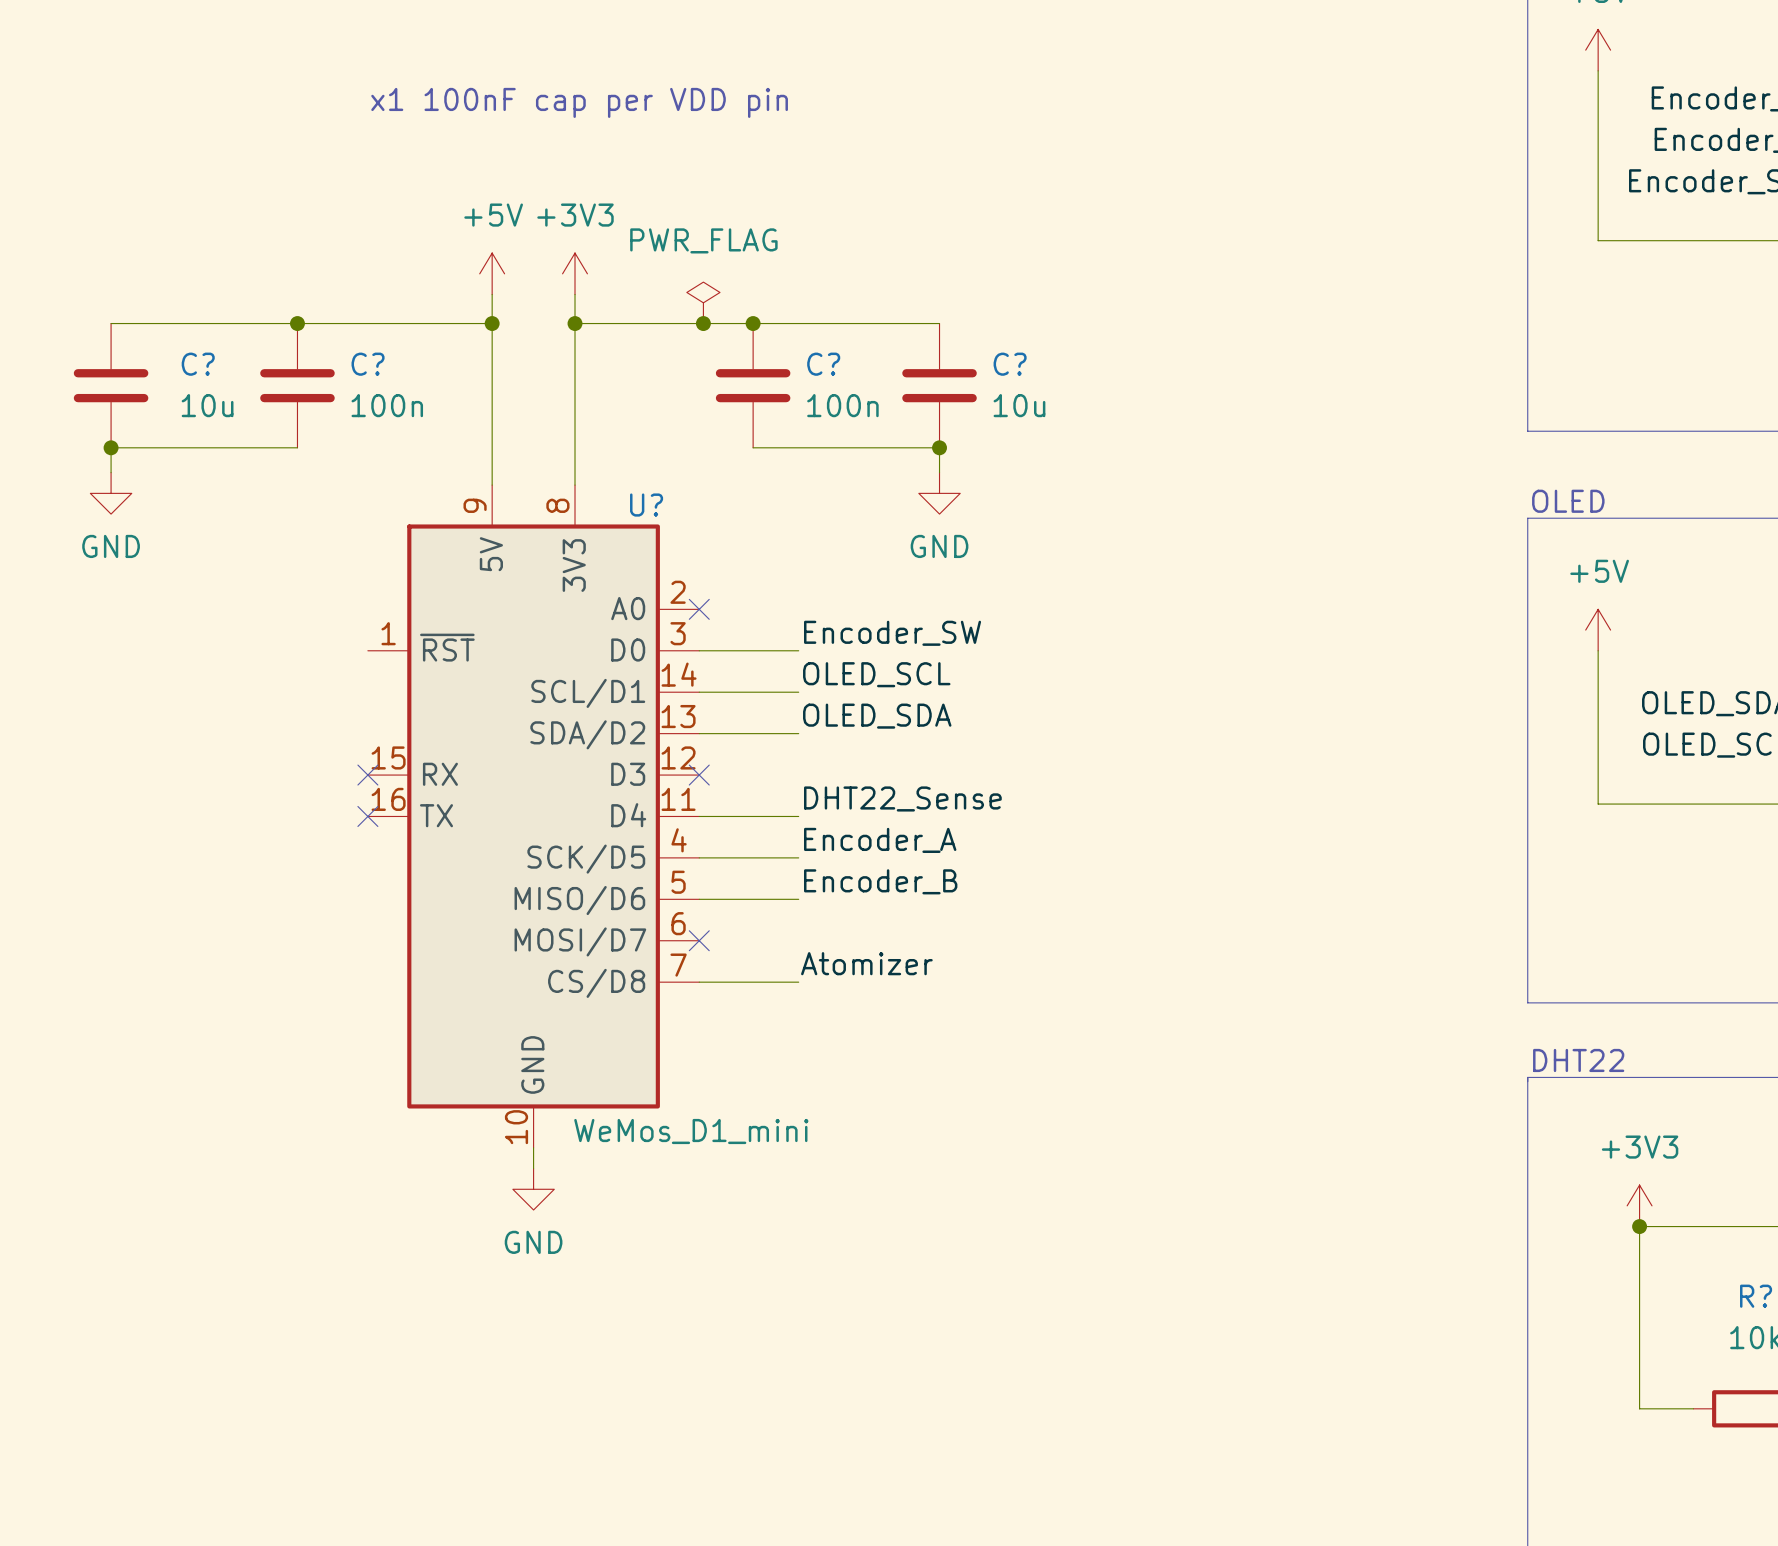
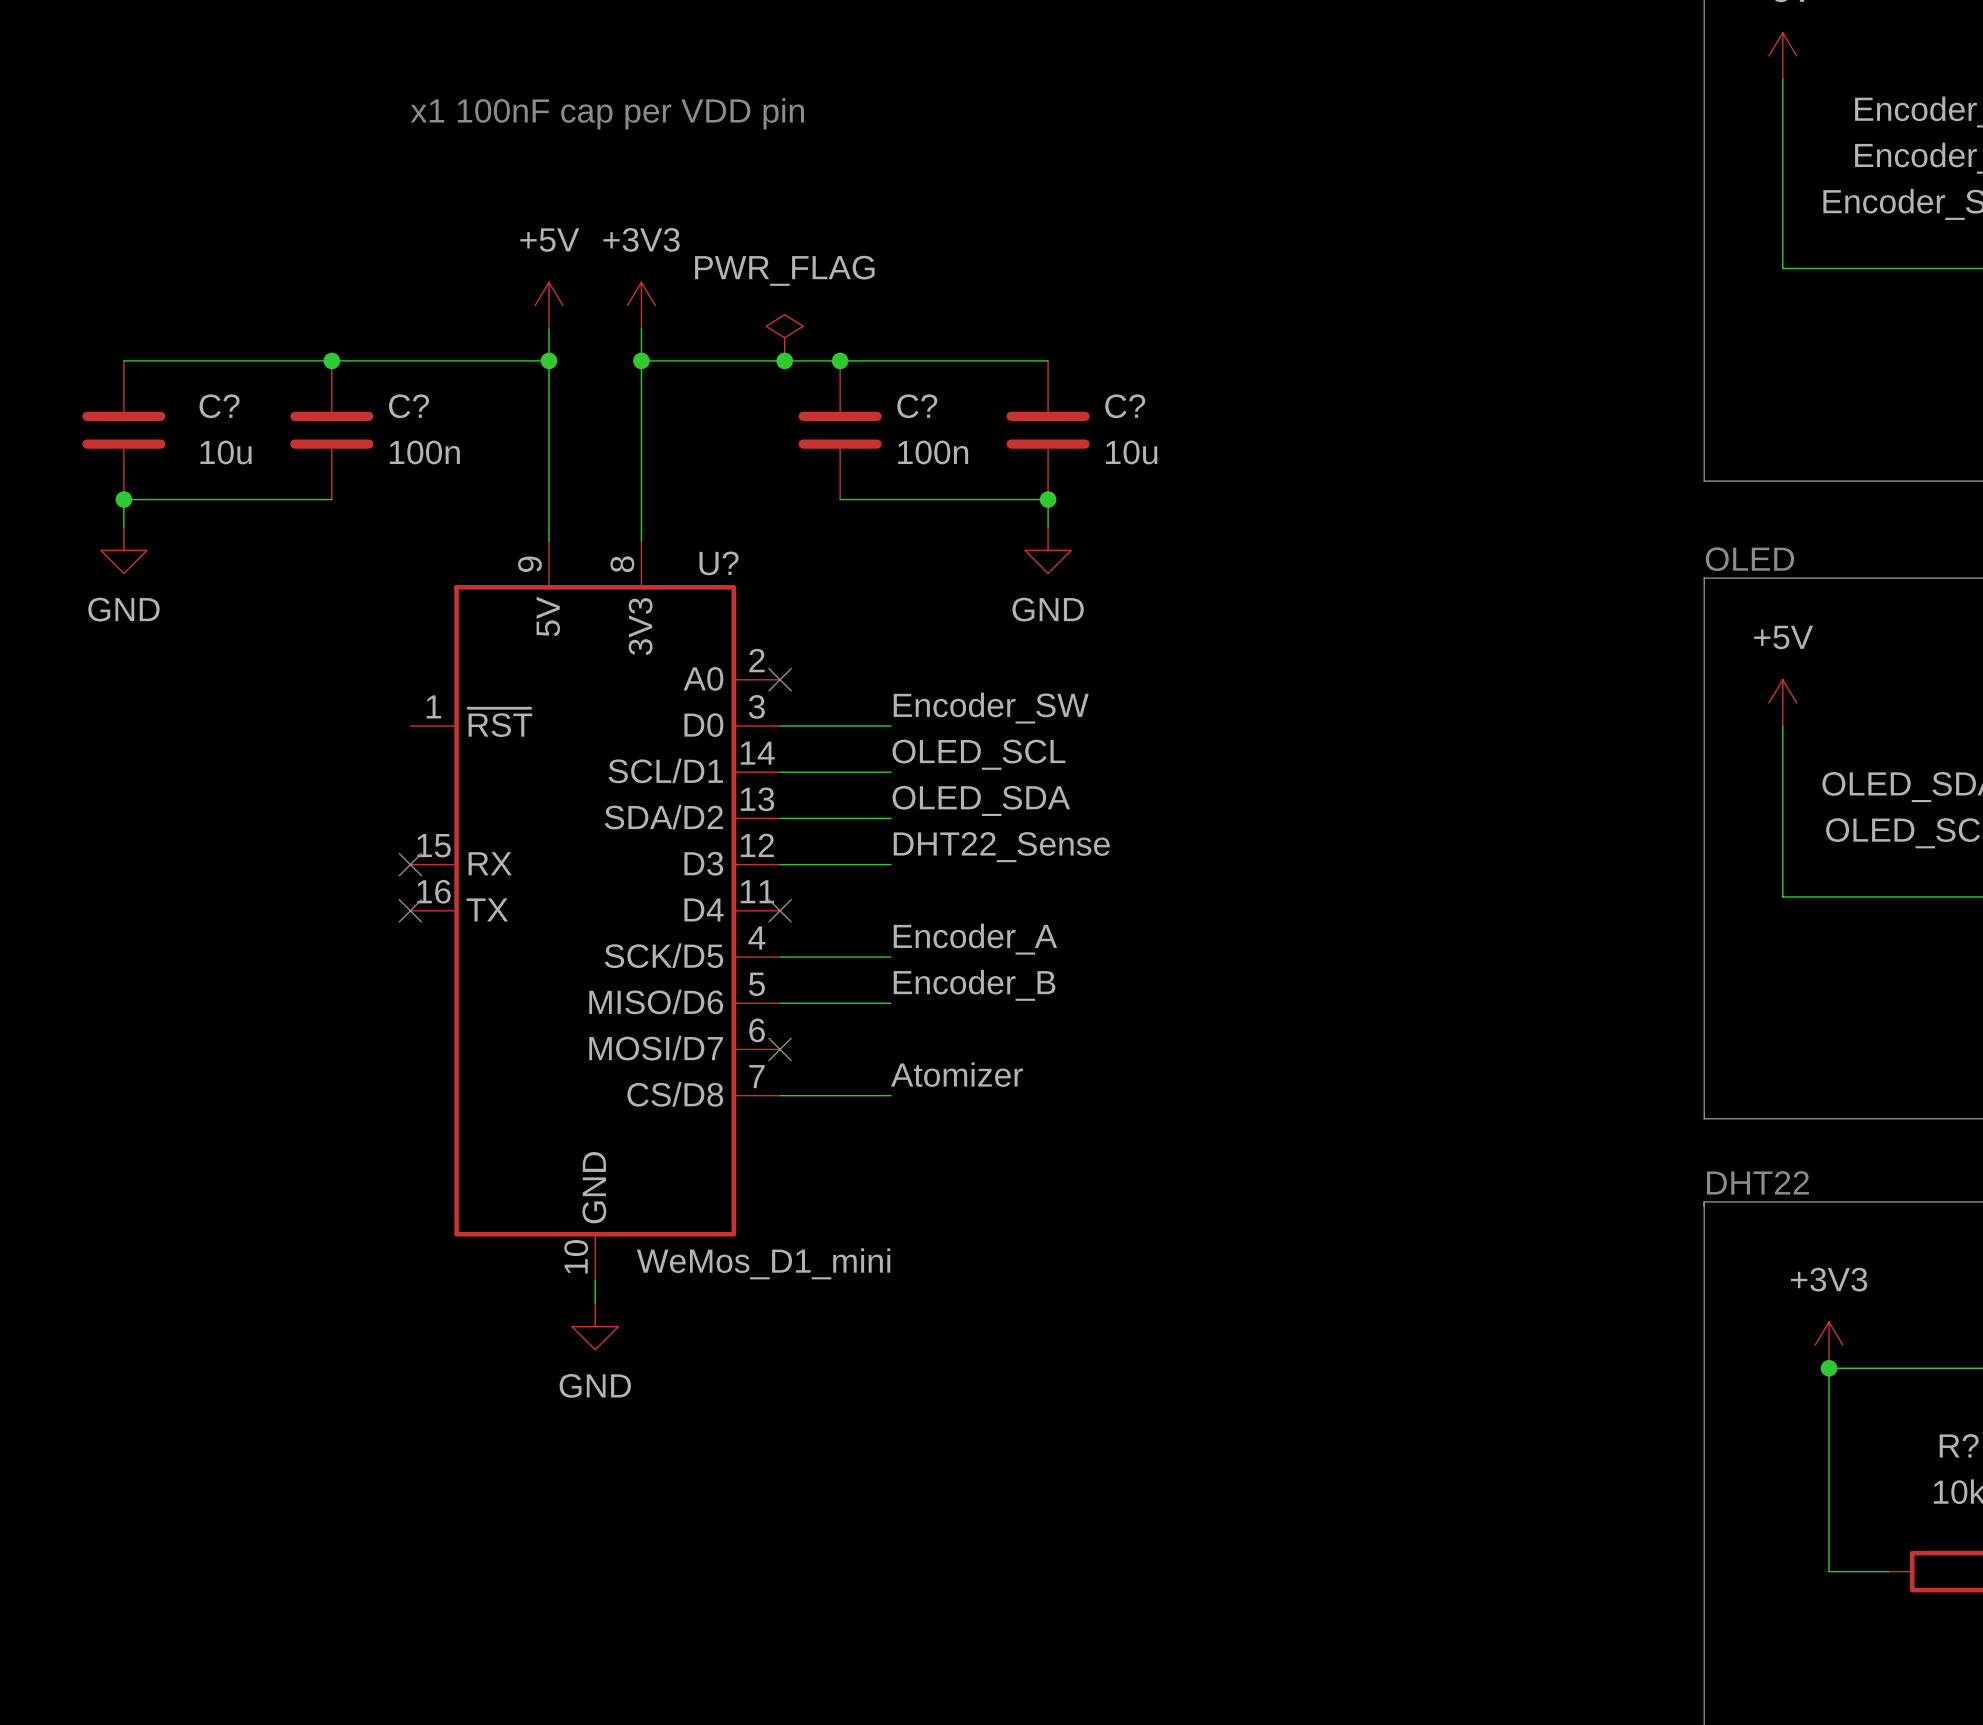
no-connect mark position: (699, 775) -> (780, 910)
label position: DHT22_Sense (902, 798) -> DHT22_Sense (1001, 847)
wire: (699, 816) (798, 816) -> (780, 864) (890, 864)

